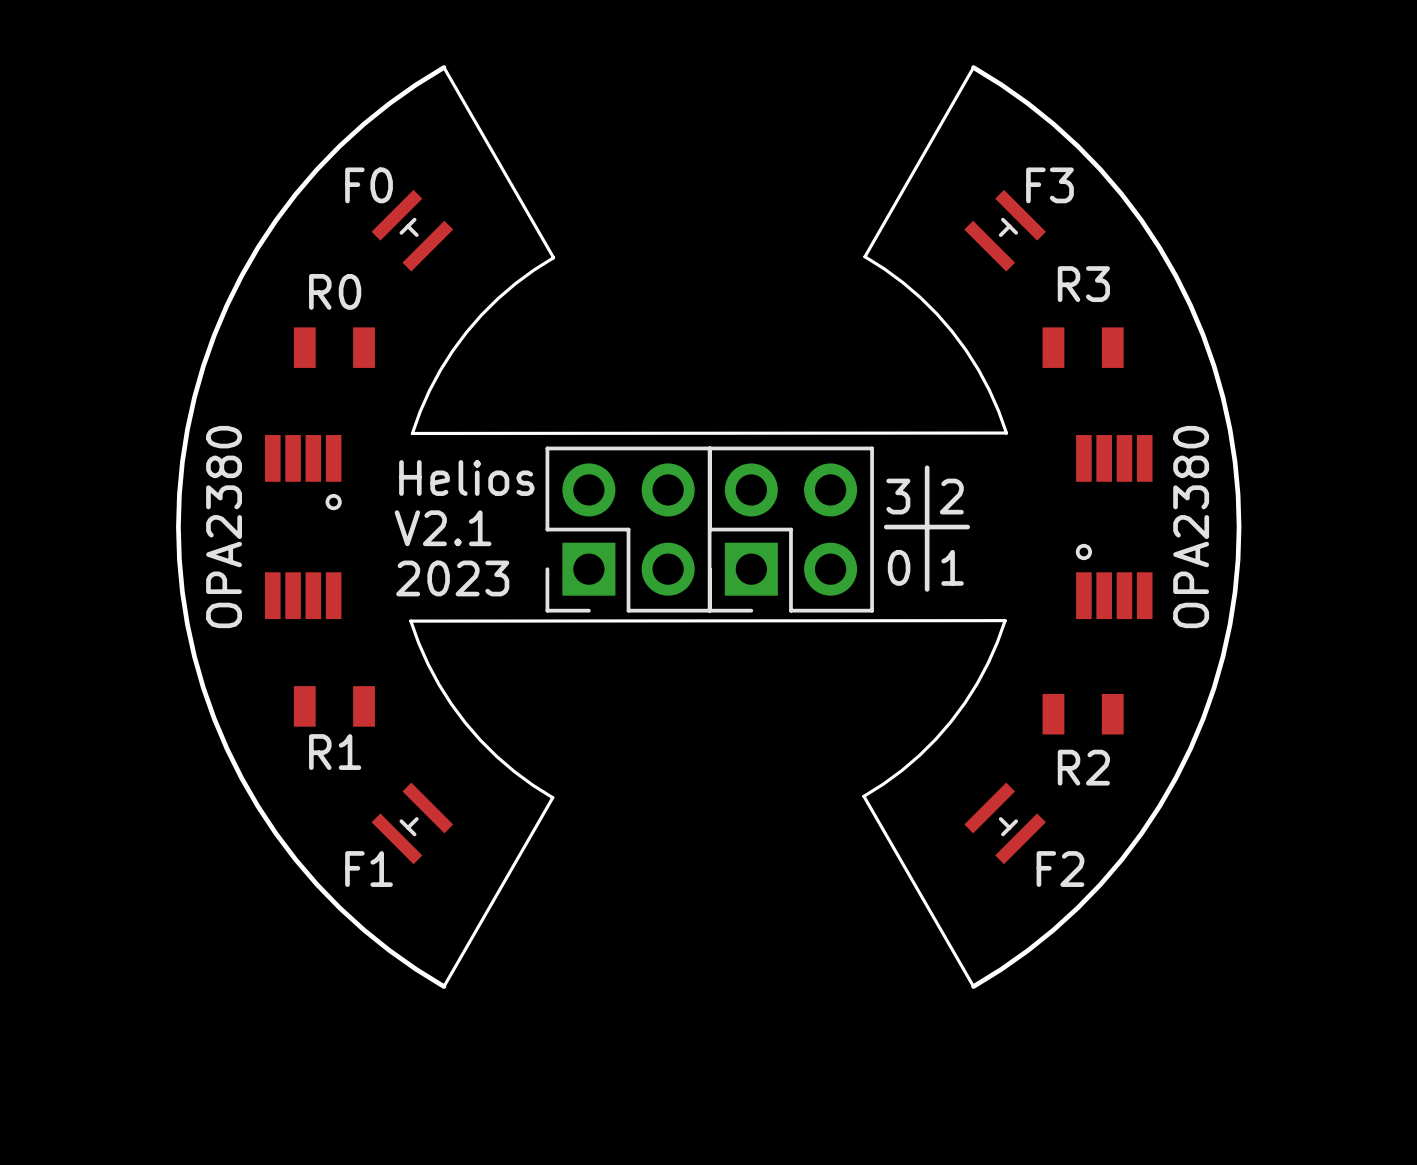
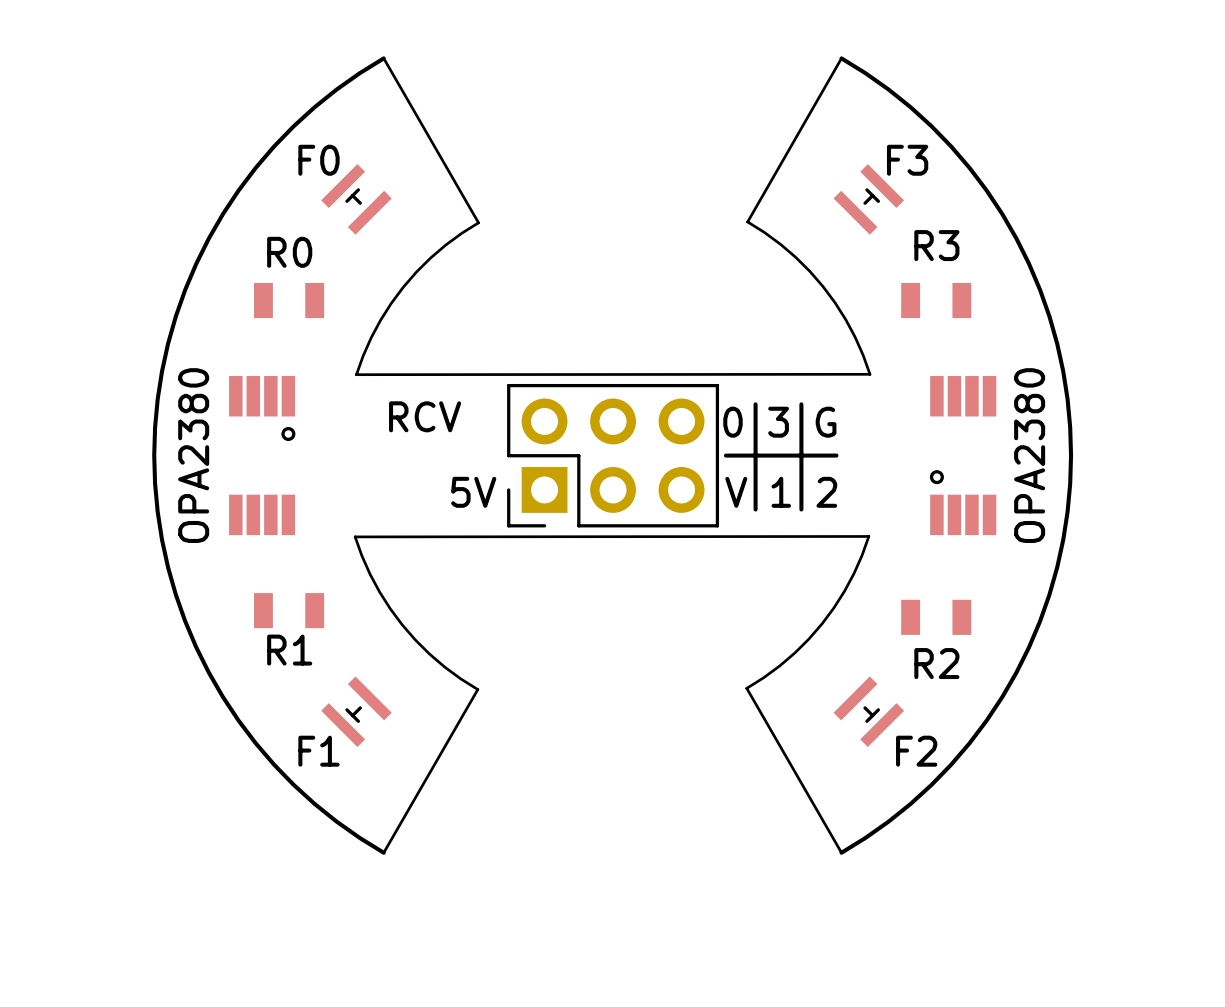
line: none -> (755, 404) (755, 509)
text: Helios (466, 478) -> none
text: none -> RCV (425, 416)
text: 3 2 (925, 496) -> 0 3 G (779, 422)
part: none -> (613, 455)
line: none -> (725, 455) (766, 455)
text: V2.1 (443, 528) -> none
part: (628, 529) -> none
part: (790, 529) -> none
text: 0 1 (925, 567) -> V 1 2 (781, 492)
text: none -> 5V (473, 492)
text: 2023 (452, 578) -> none

